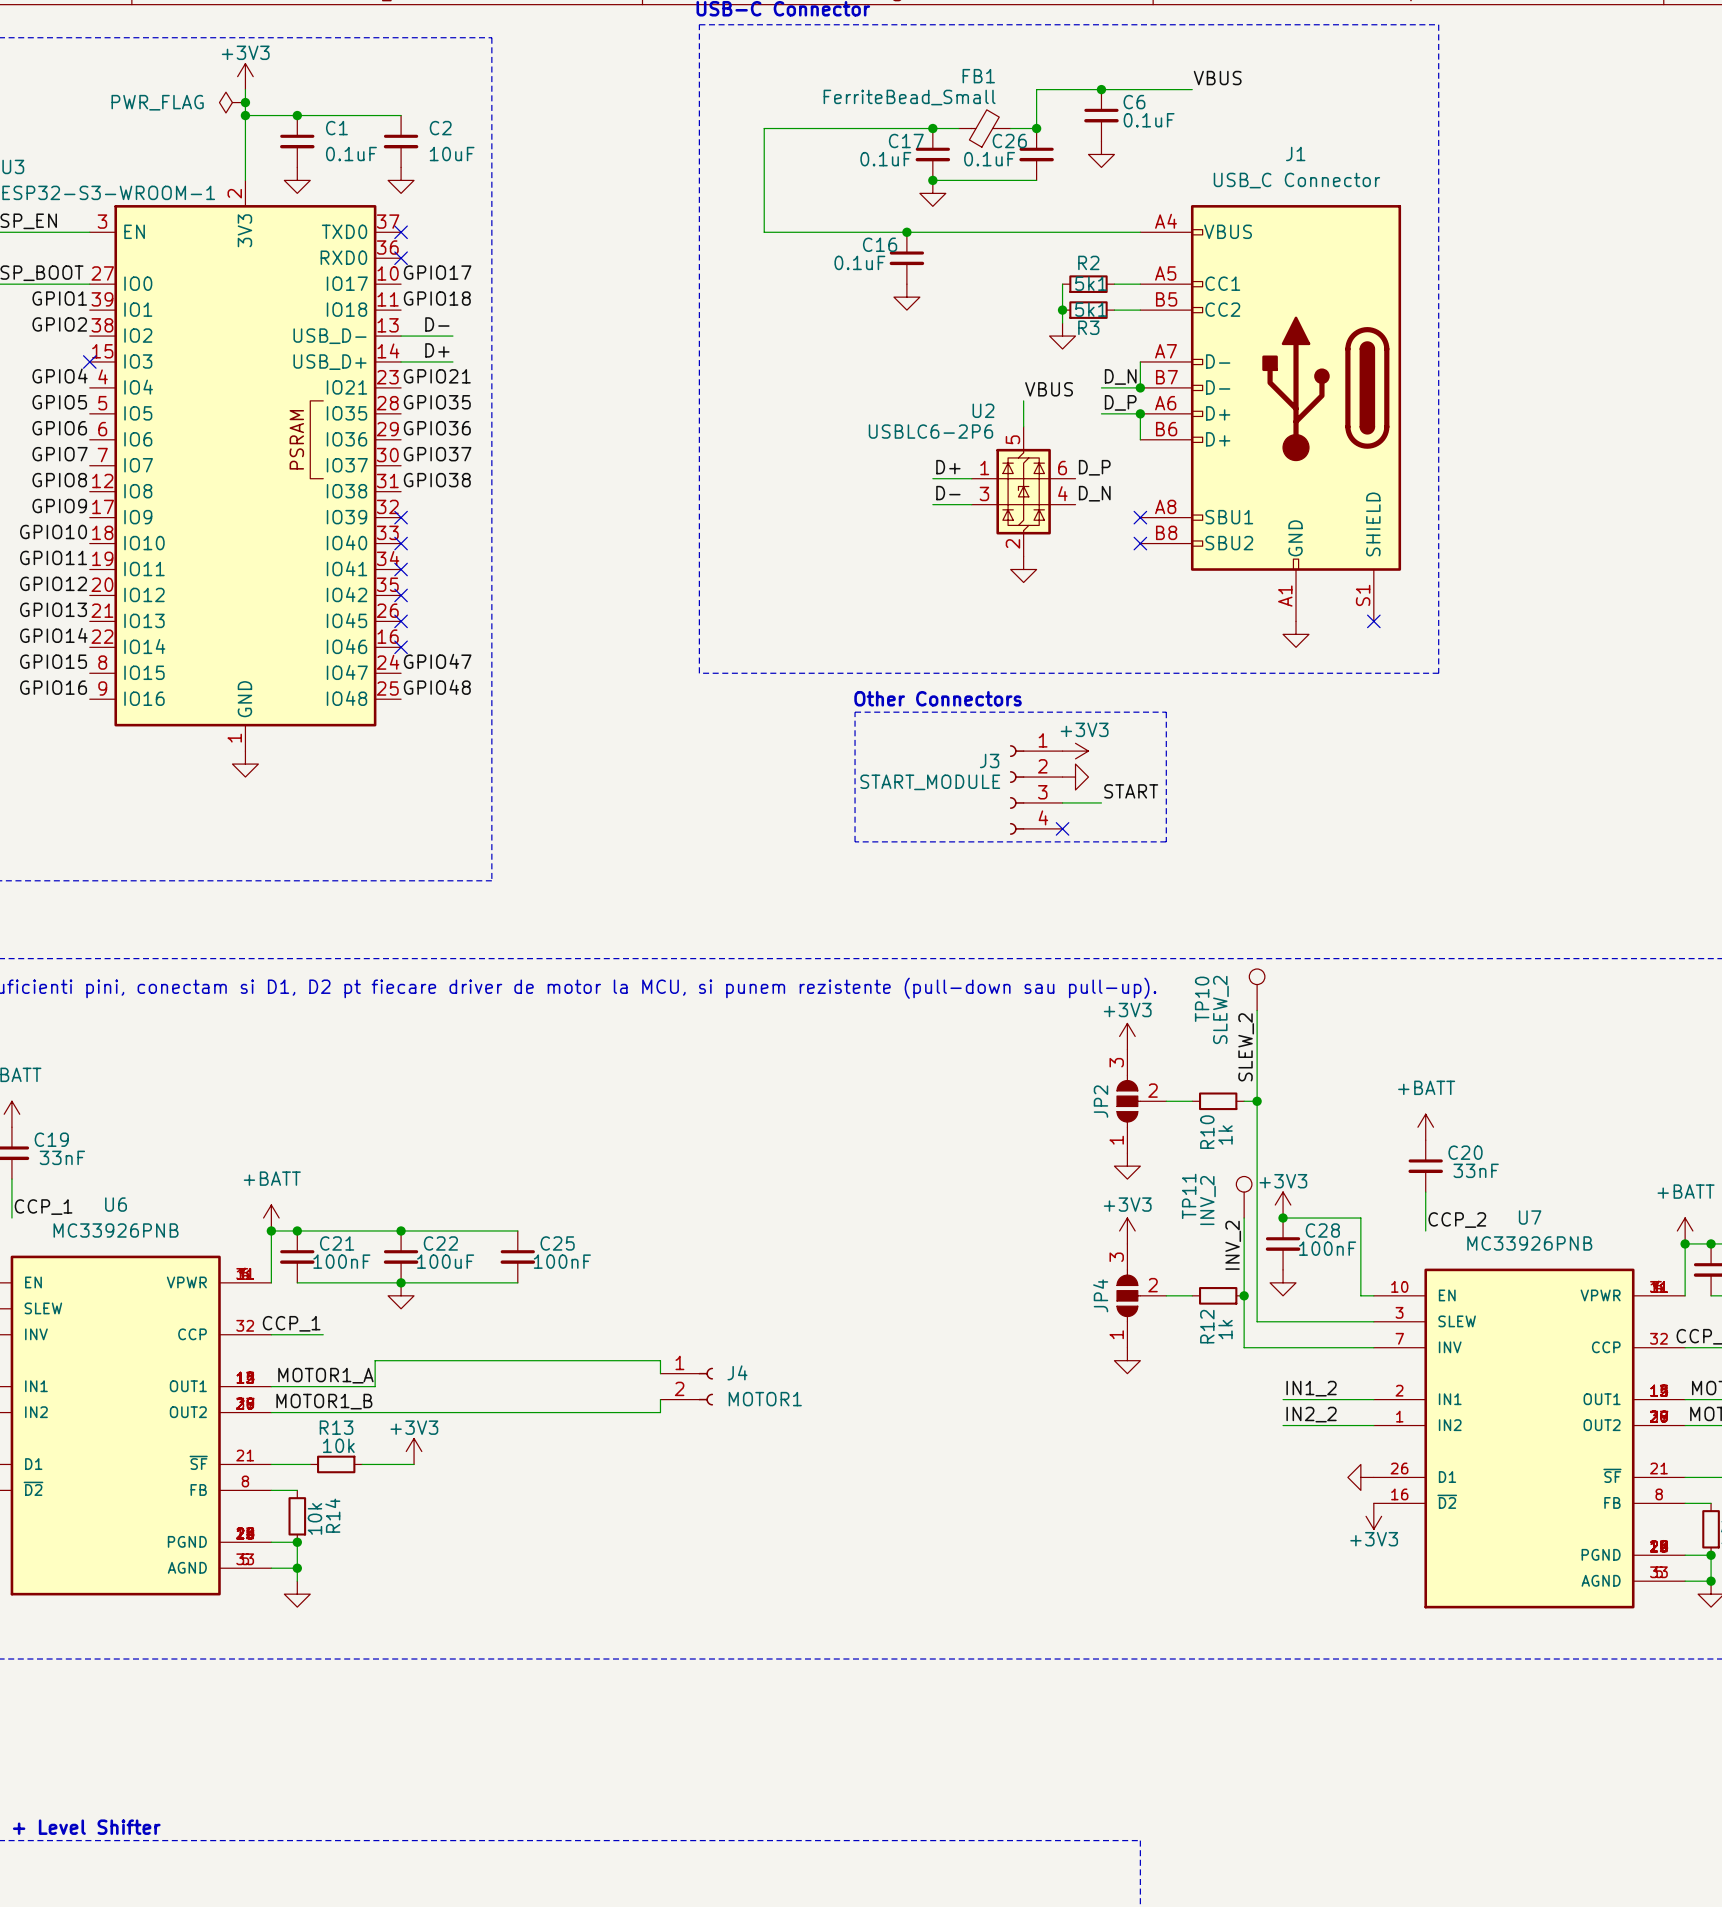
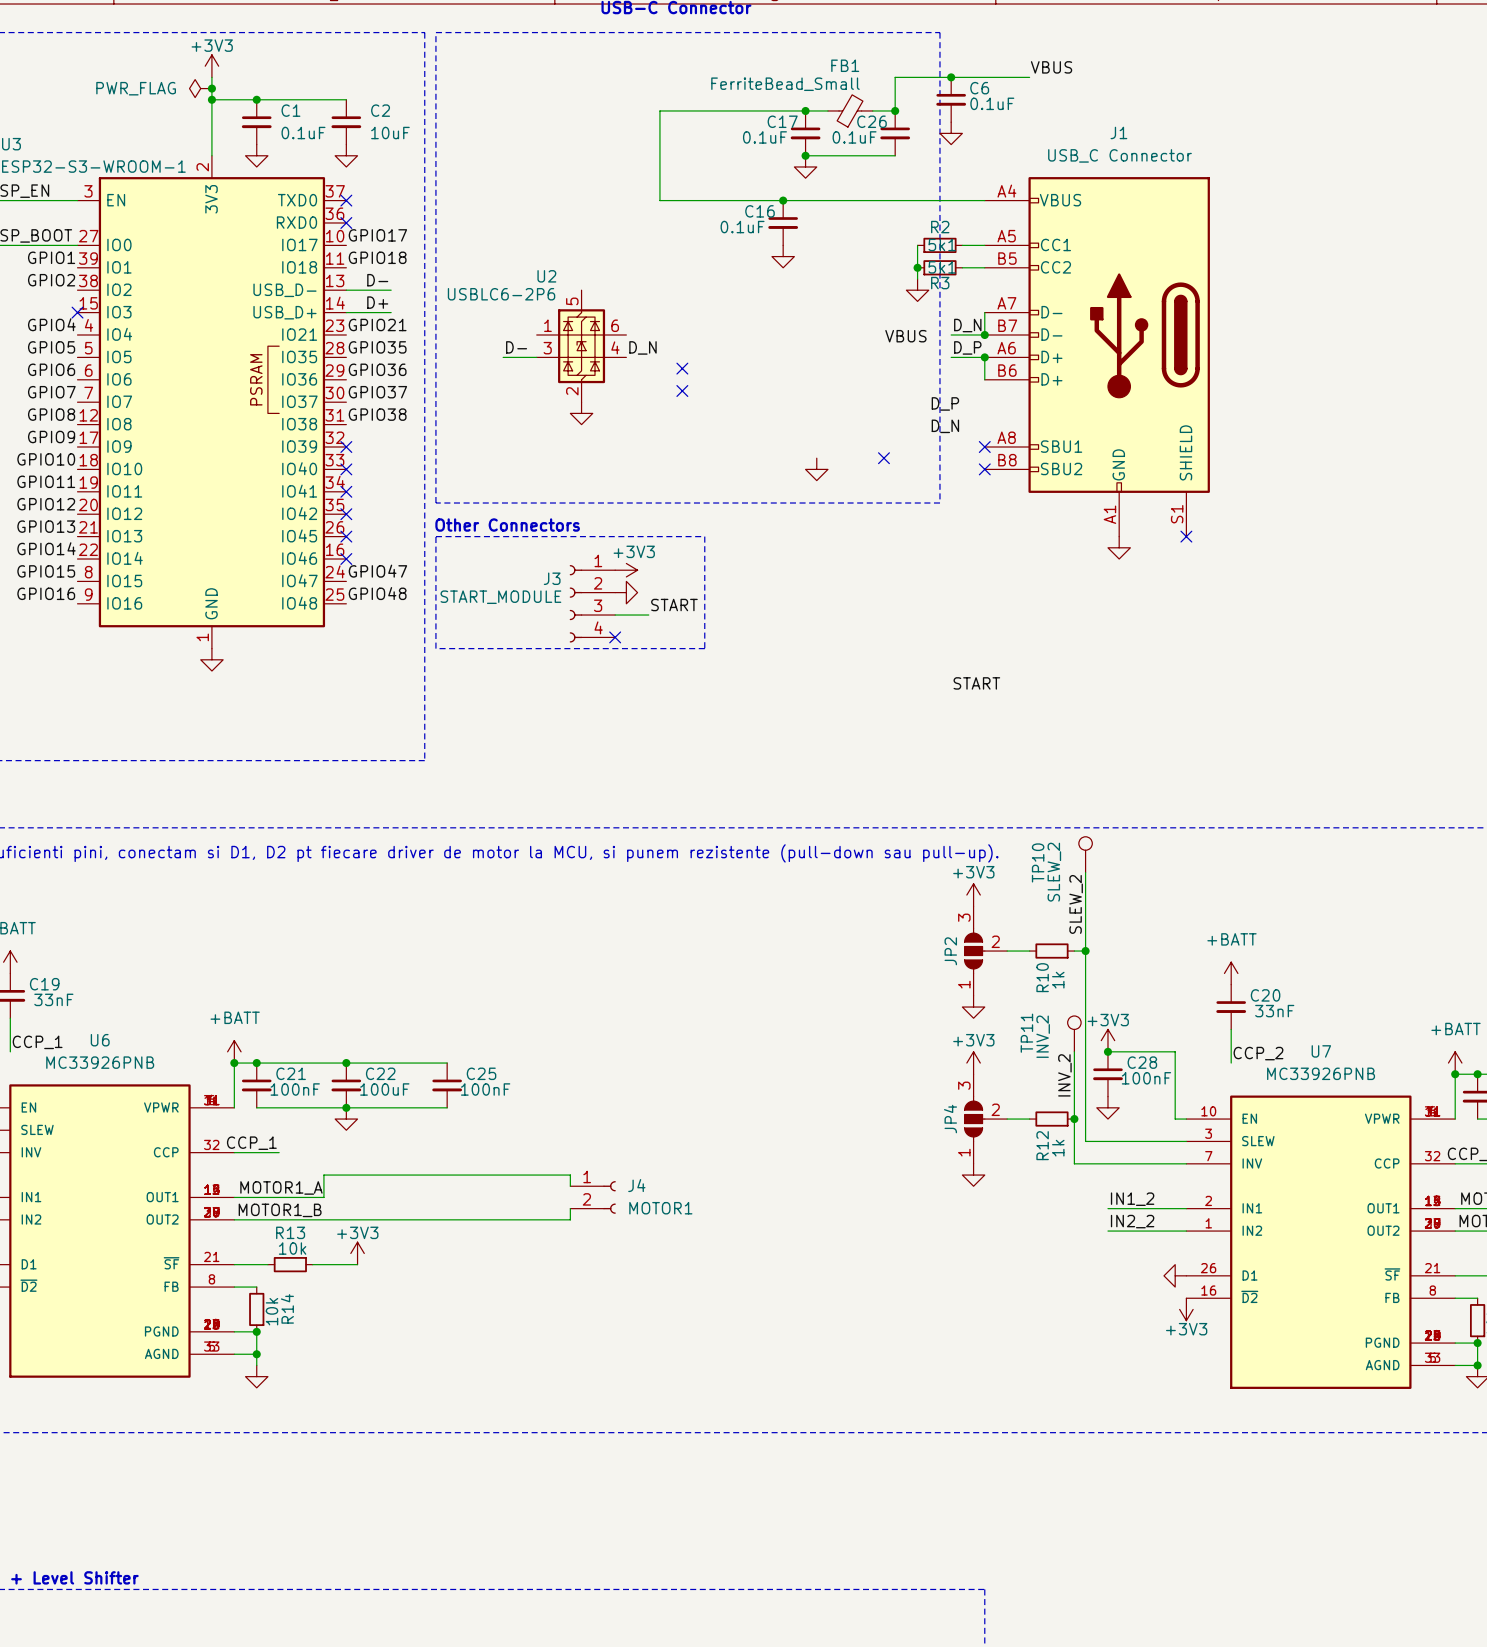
line: (699, 24) (1438, 24) (1438, 673) (699, 673) (699, 24) -> none
line: none -> (435, 32) (435, 503) (939, 503) (939, 32) (435, 32)
wire: (1023, 400) (1023, 426) -> none
label: none -> D- (516, 347)
label: none -> D_N (642, 347)
wire: none -> (503, 357) (536, 357)
no-connect mark: none -> (682, 368)
no-connect mark: none -> (682, 391)
label: D+ (948, 467) -> none
power symbol: none -> (581, 413)
wire: (932, 478) (971, 478) -> none
U2 position: (1023, 491) -> (581, 346)
label: D- (948, 493) -> none
wire: (932, 504) (971, 504) -> none
no-connect mark: none -> (883, 458)
power symbol position: (1023, 569) -> (816, 469)
text: none -> Other Connectors (507, 525)
line: none -> (435, 536) (704, 536) (704, 648) (435, 648) (435, 536)
power symbol: none -> +3V3 (626, 570)
power symbol: none -> (626, 592)
text: Other Connectors (938, 698) -> none
label: none -> START (674, 605)
wire: none -> (615, 615) (648, 615)
line: (855, 712) (1166, 712) (1166, 841) (855, 841) (855, 712) -> none
no-connect mark: none -> (615, 637)
power symbol: +3V3 (1075, 751) -> none
power symbol: (1075, 777) -> none
J3 position: (1036, 790) -> (592, 603)
wire: (1062, 802) (1101, 802) -> none
no-connect mark: (1062, 828) -> none

